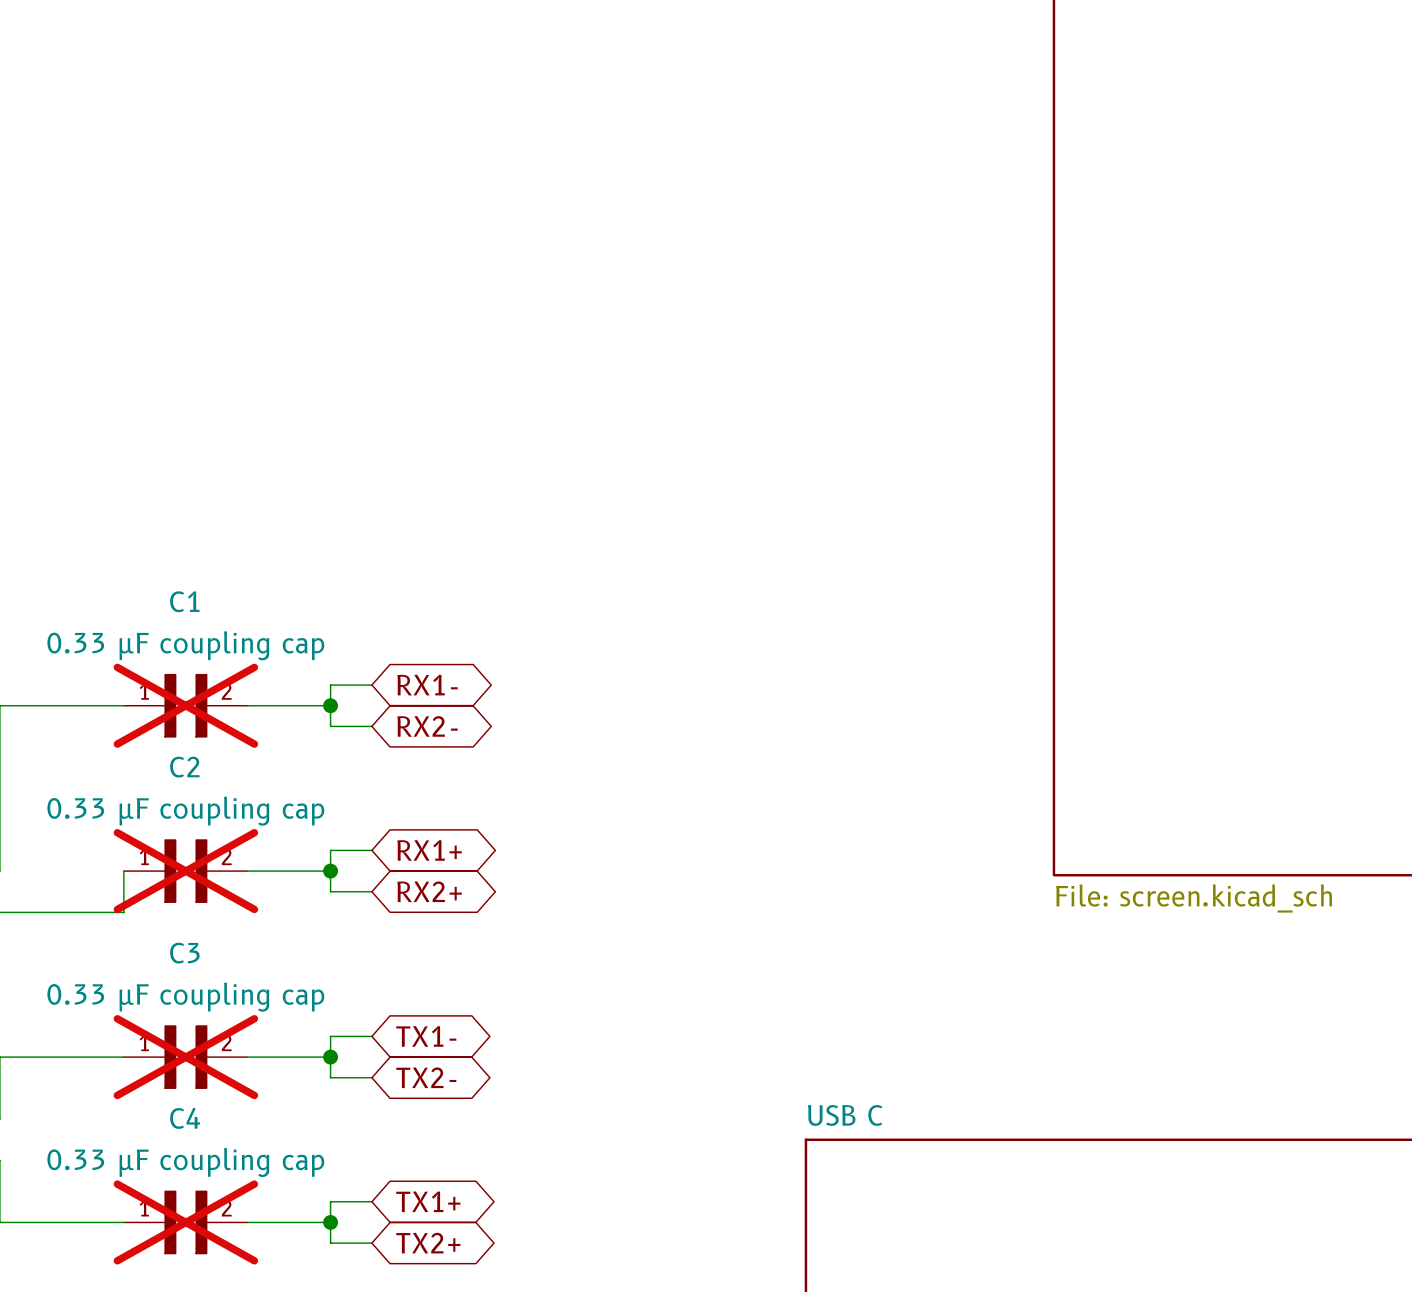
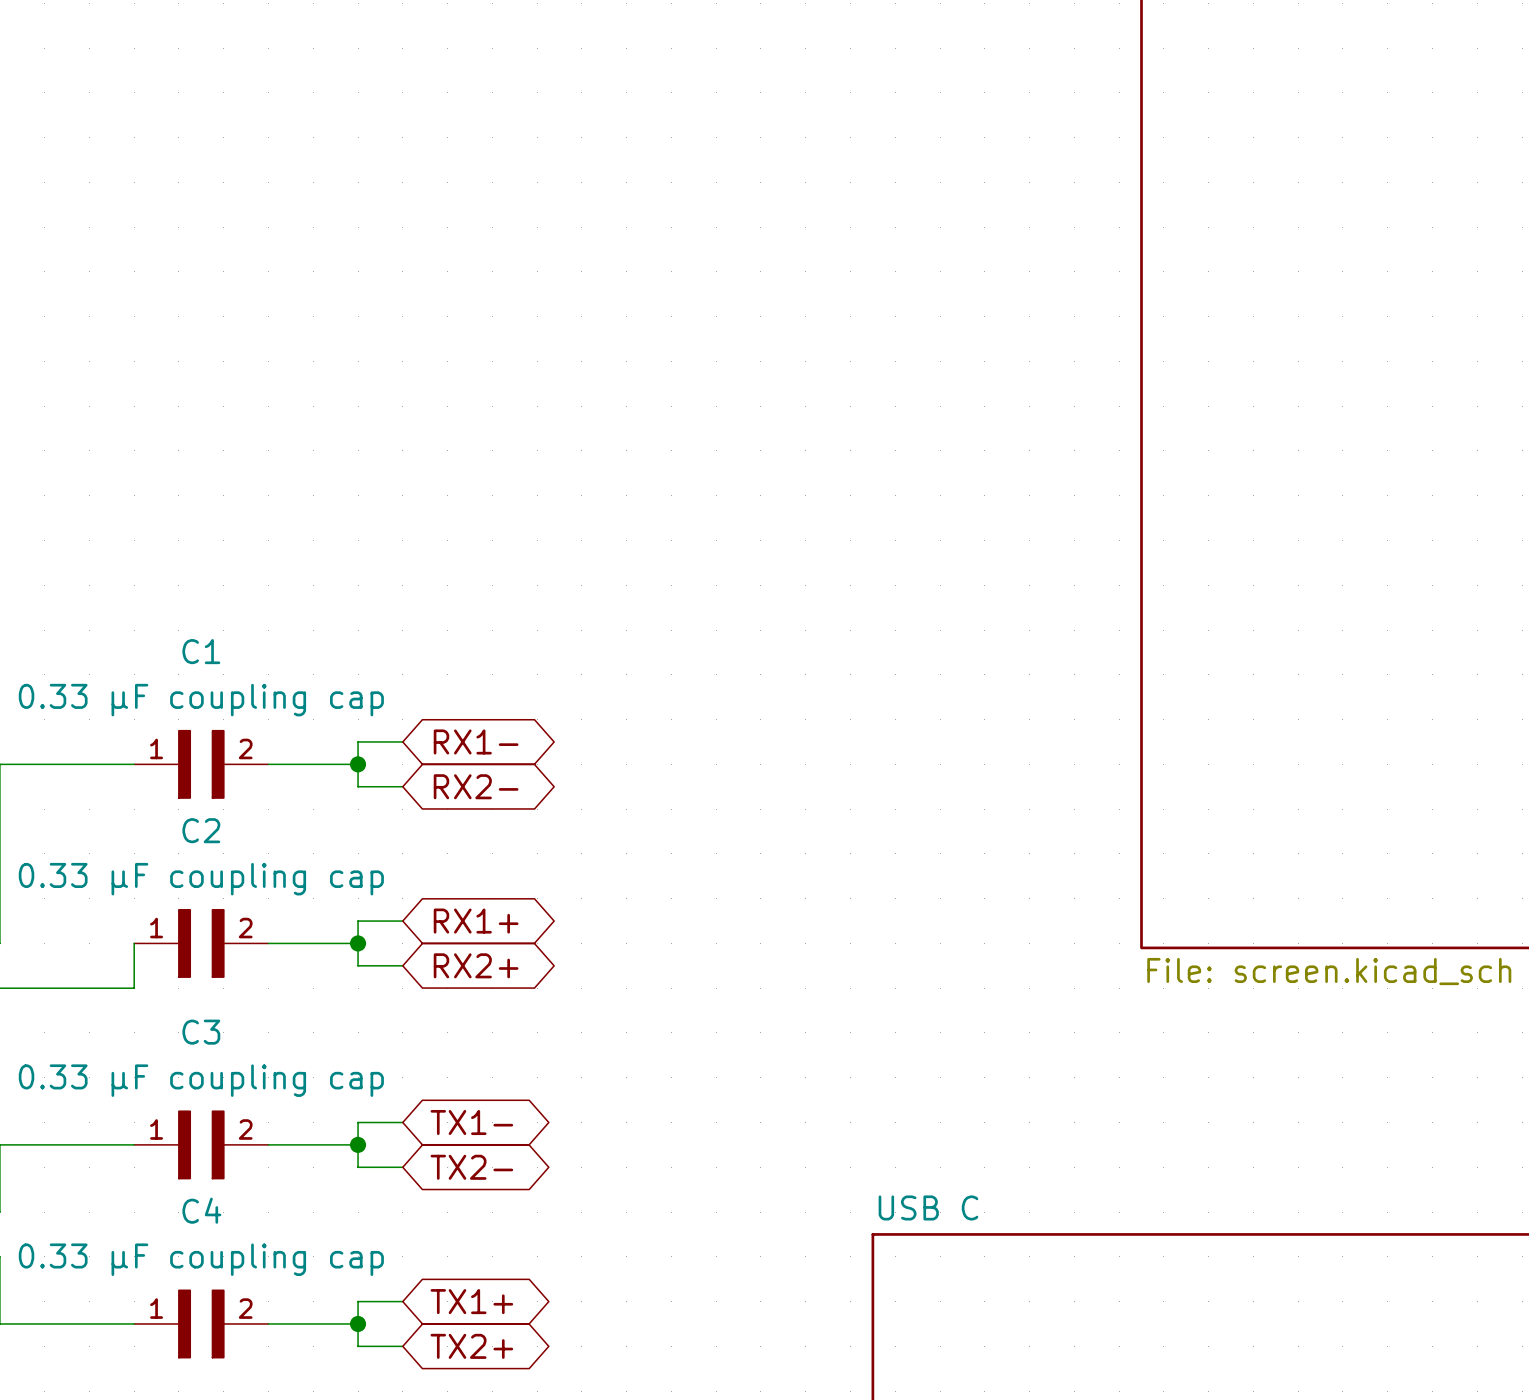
C1 do-not-place cross: (185, 705) -> none
C2 do-not-place cross: (185, 871) -> none
C3 do-not-place cross: (185, 1057) -> none
C4 do-not-place cross: (185, 1222) -> none

